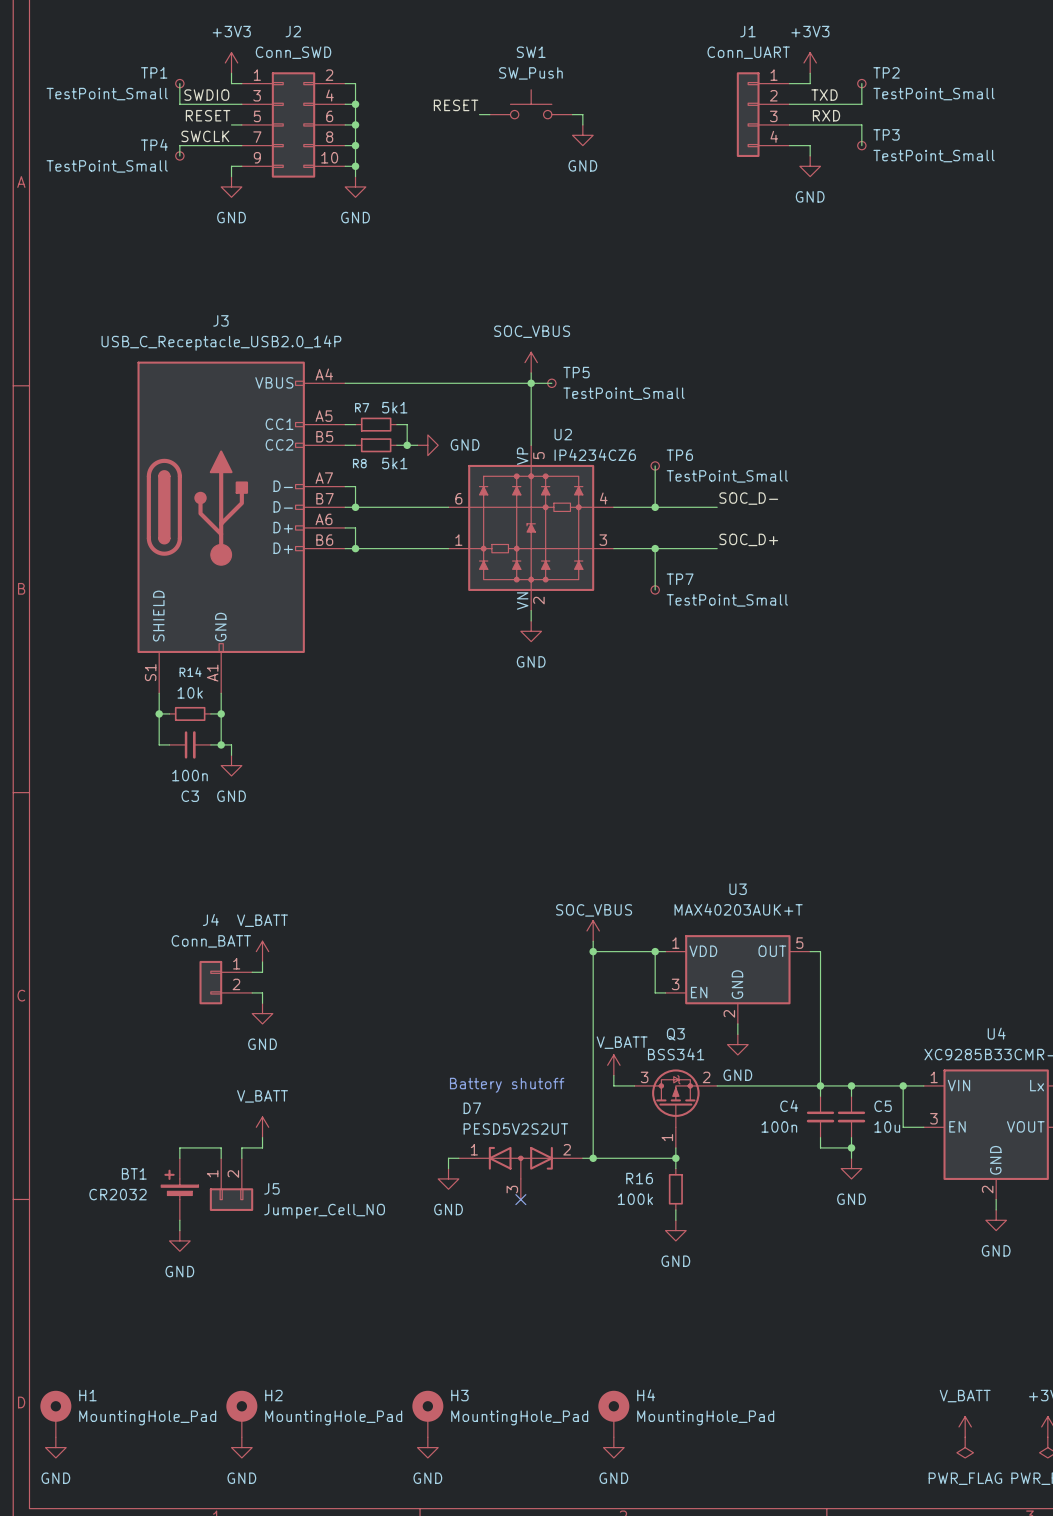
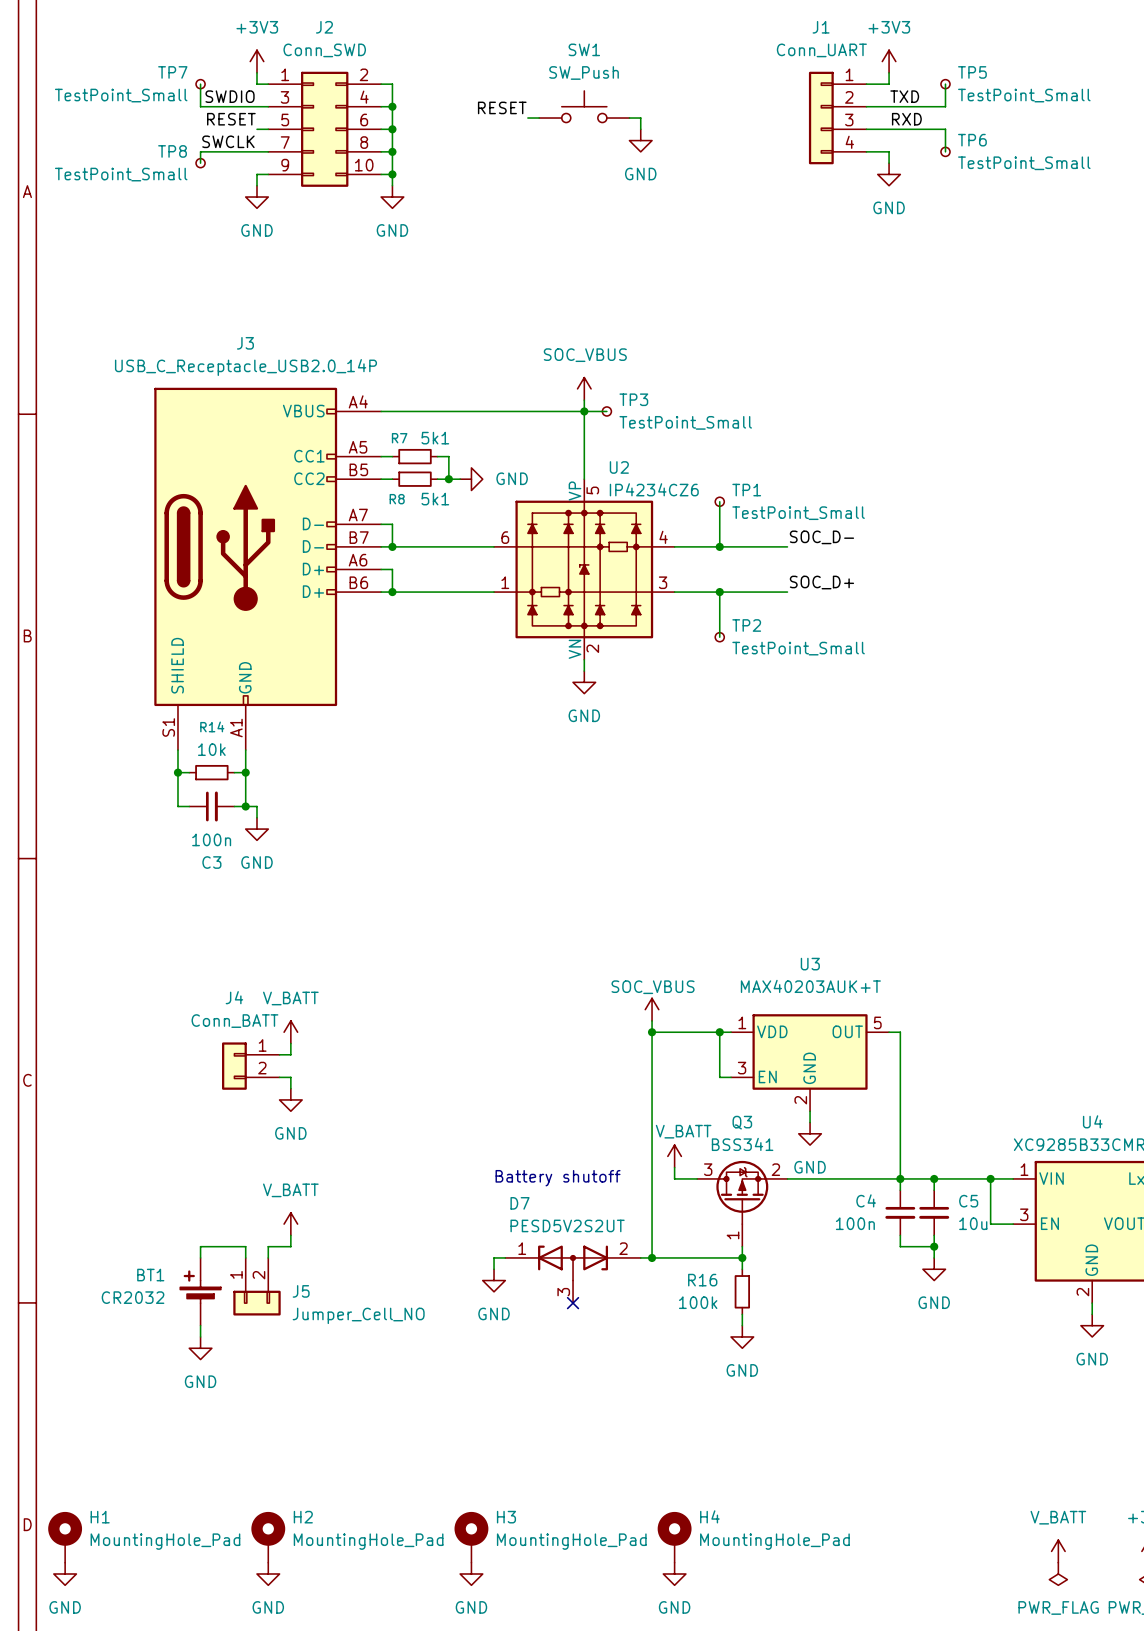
TP1 name: TP1 (154, 72) -> TP7 (172, 72)
TP2 name: TP2 (886, 72) -> TP5 (972, 72)
TP3 name: TP3 (886, 134) -> TP6 (972, 140)
TP4 name: TP4 (154, 144) -> TP8 (172, 151)
TP5 name: TP5 (576, 372) -> TP3 (633, 399)
TP6 name: TP6 (679, 455) -> TP1 (746, 490)
TP7 name: TP7 (680, 579) -> TP2 (746, 625)

